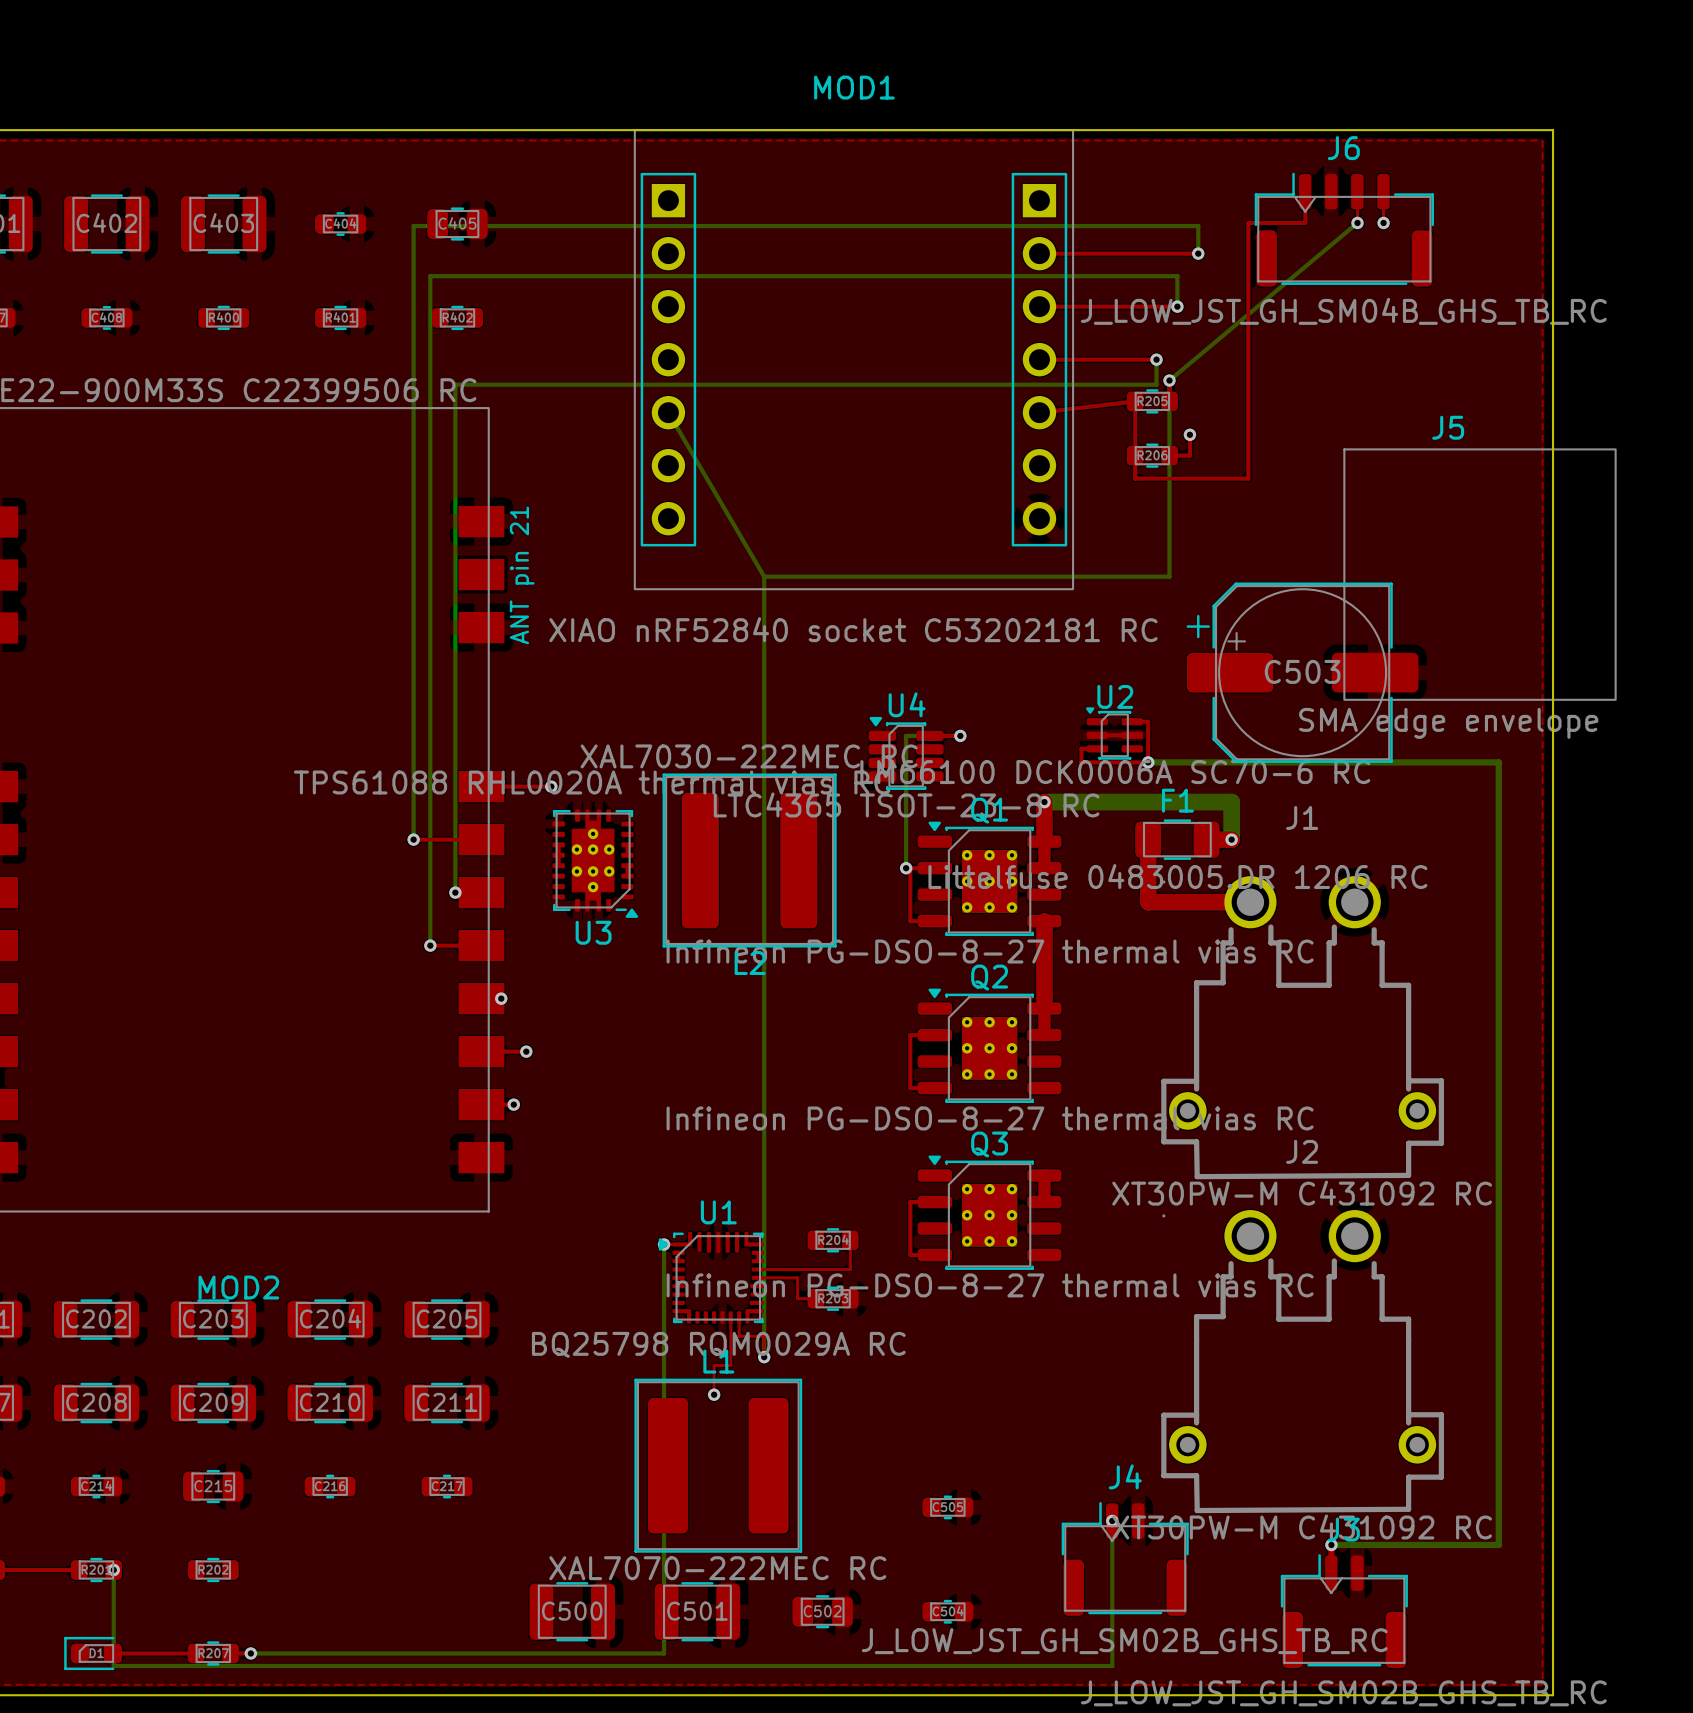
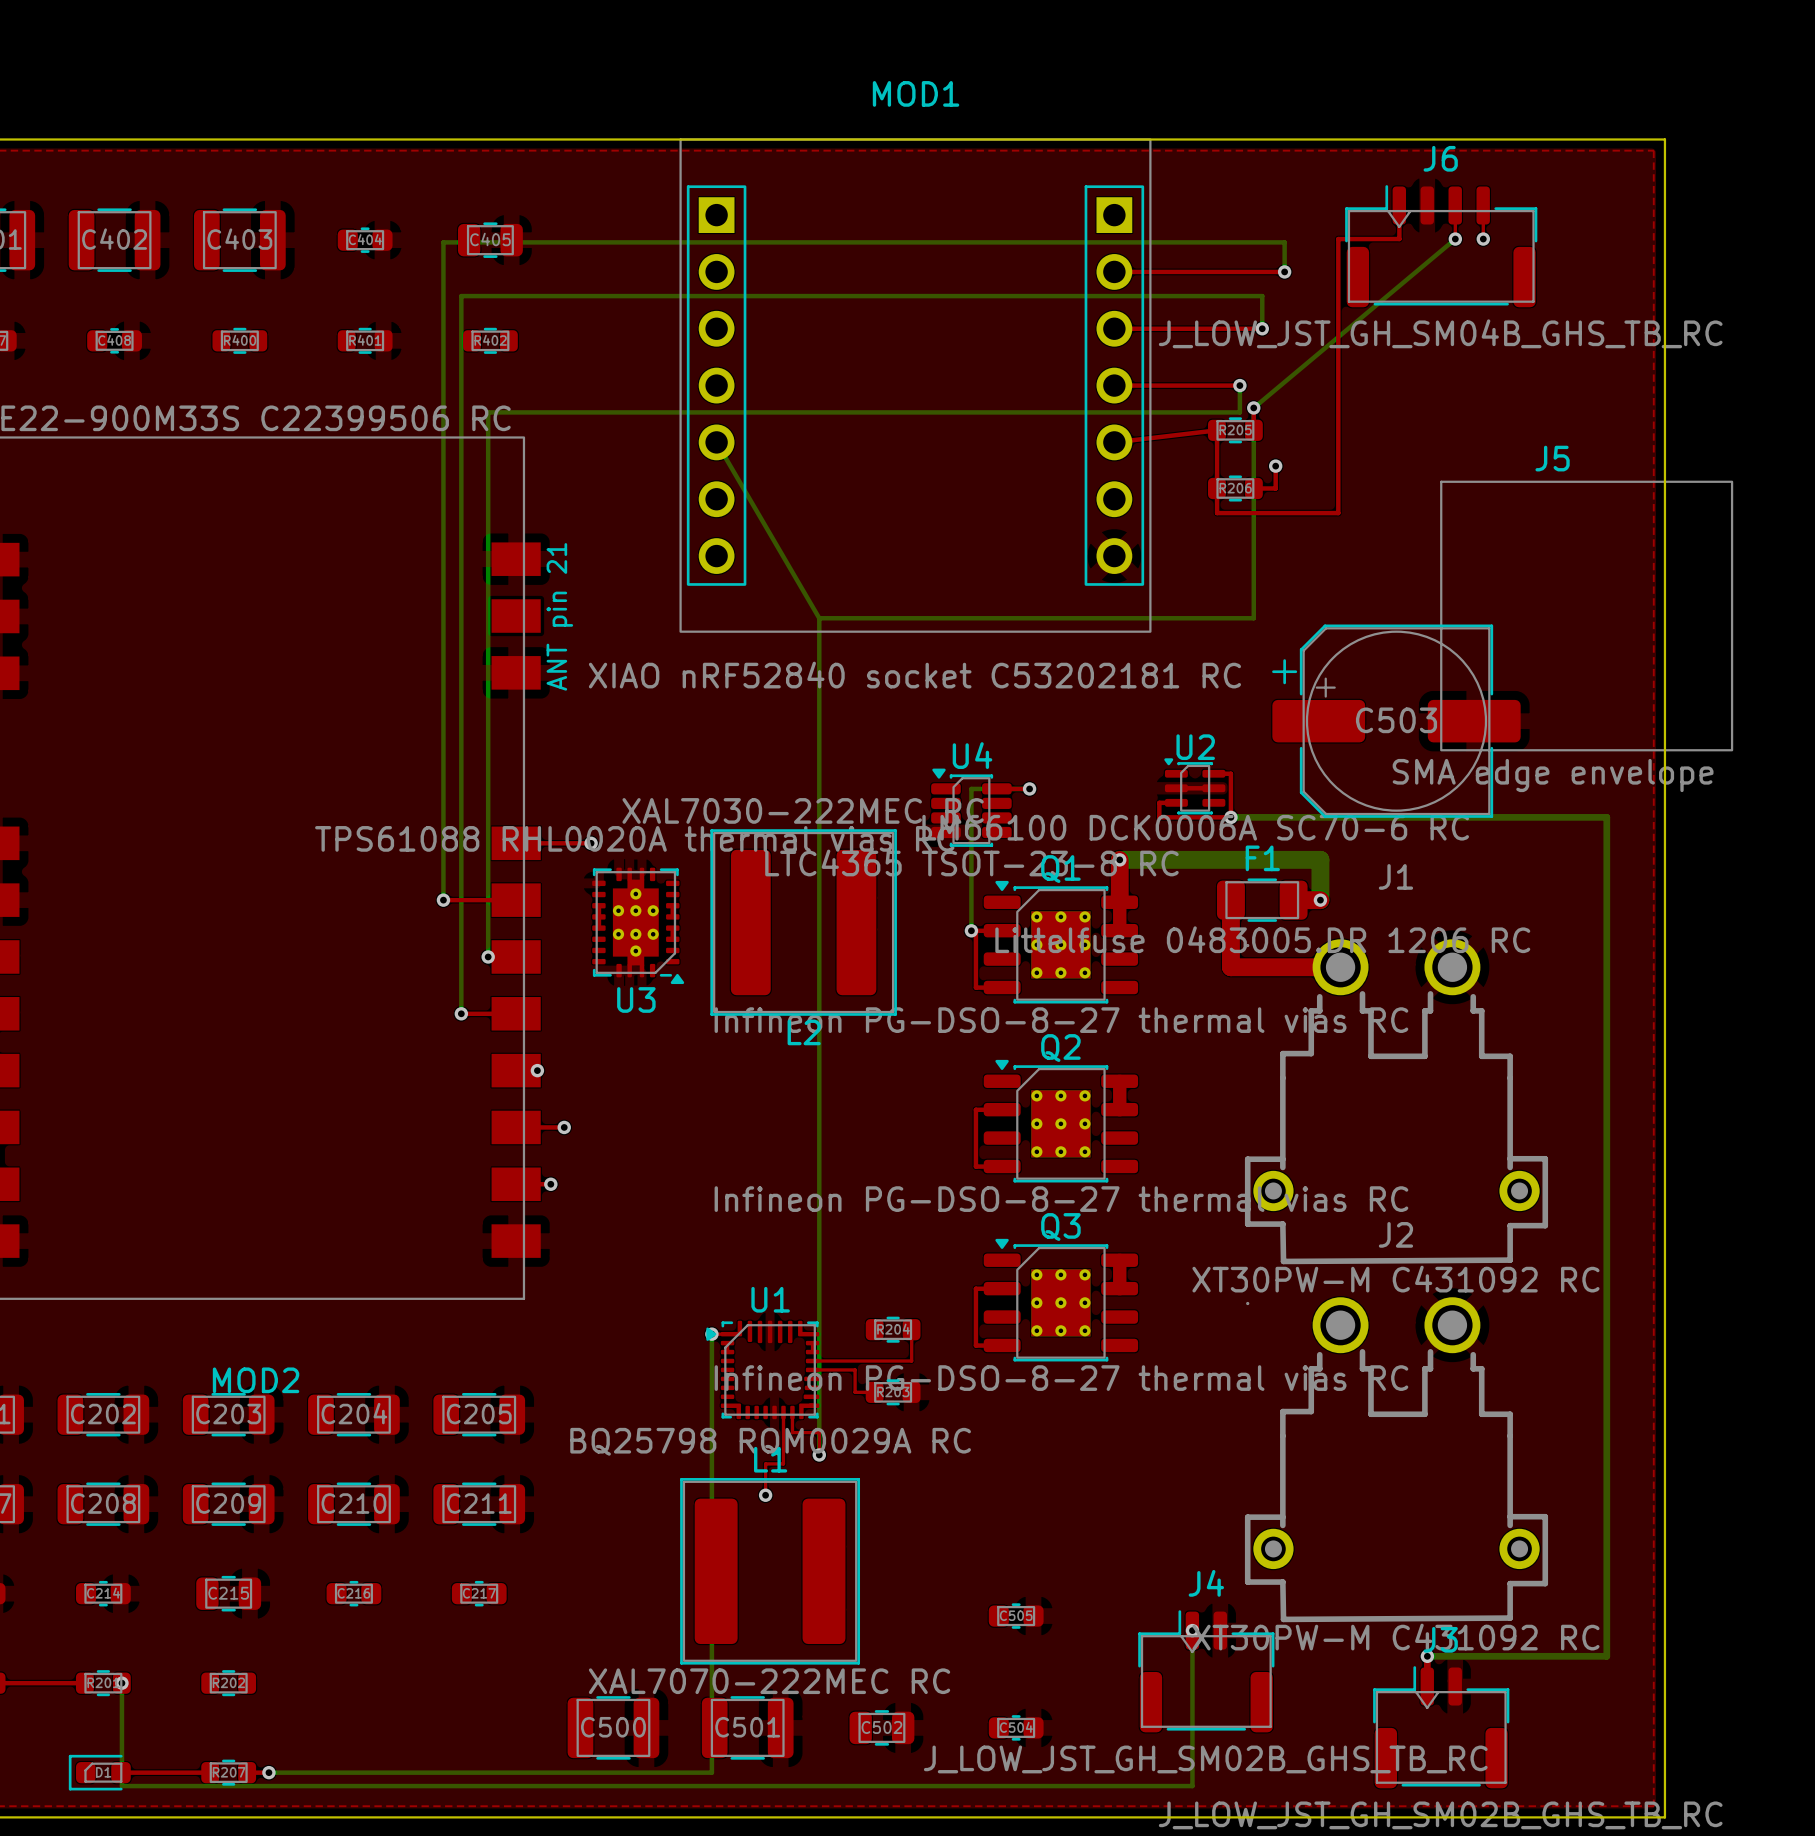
top track: (1044, 921) (1044, 1008) -> none

